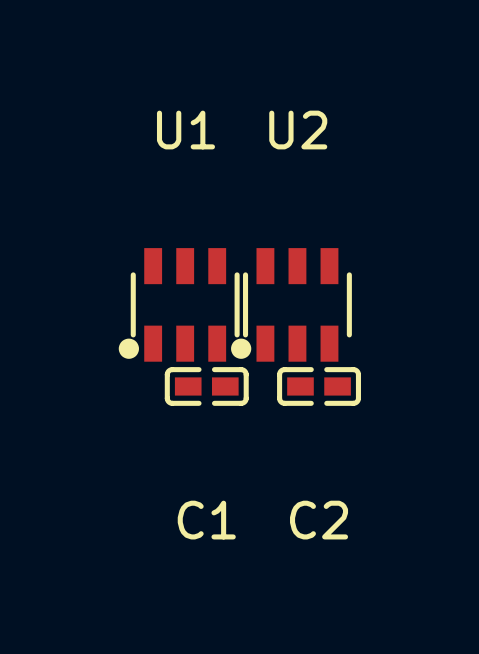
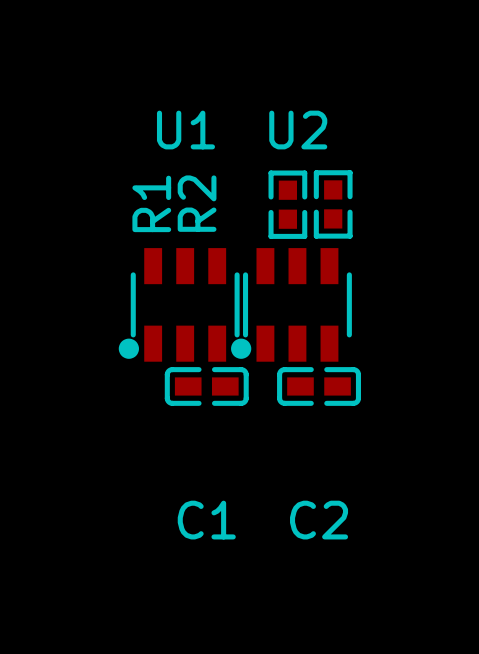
R1: none -> (287, 204)
R2: none -> (333, 204)

